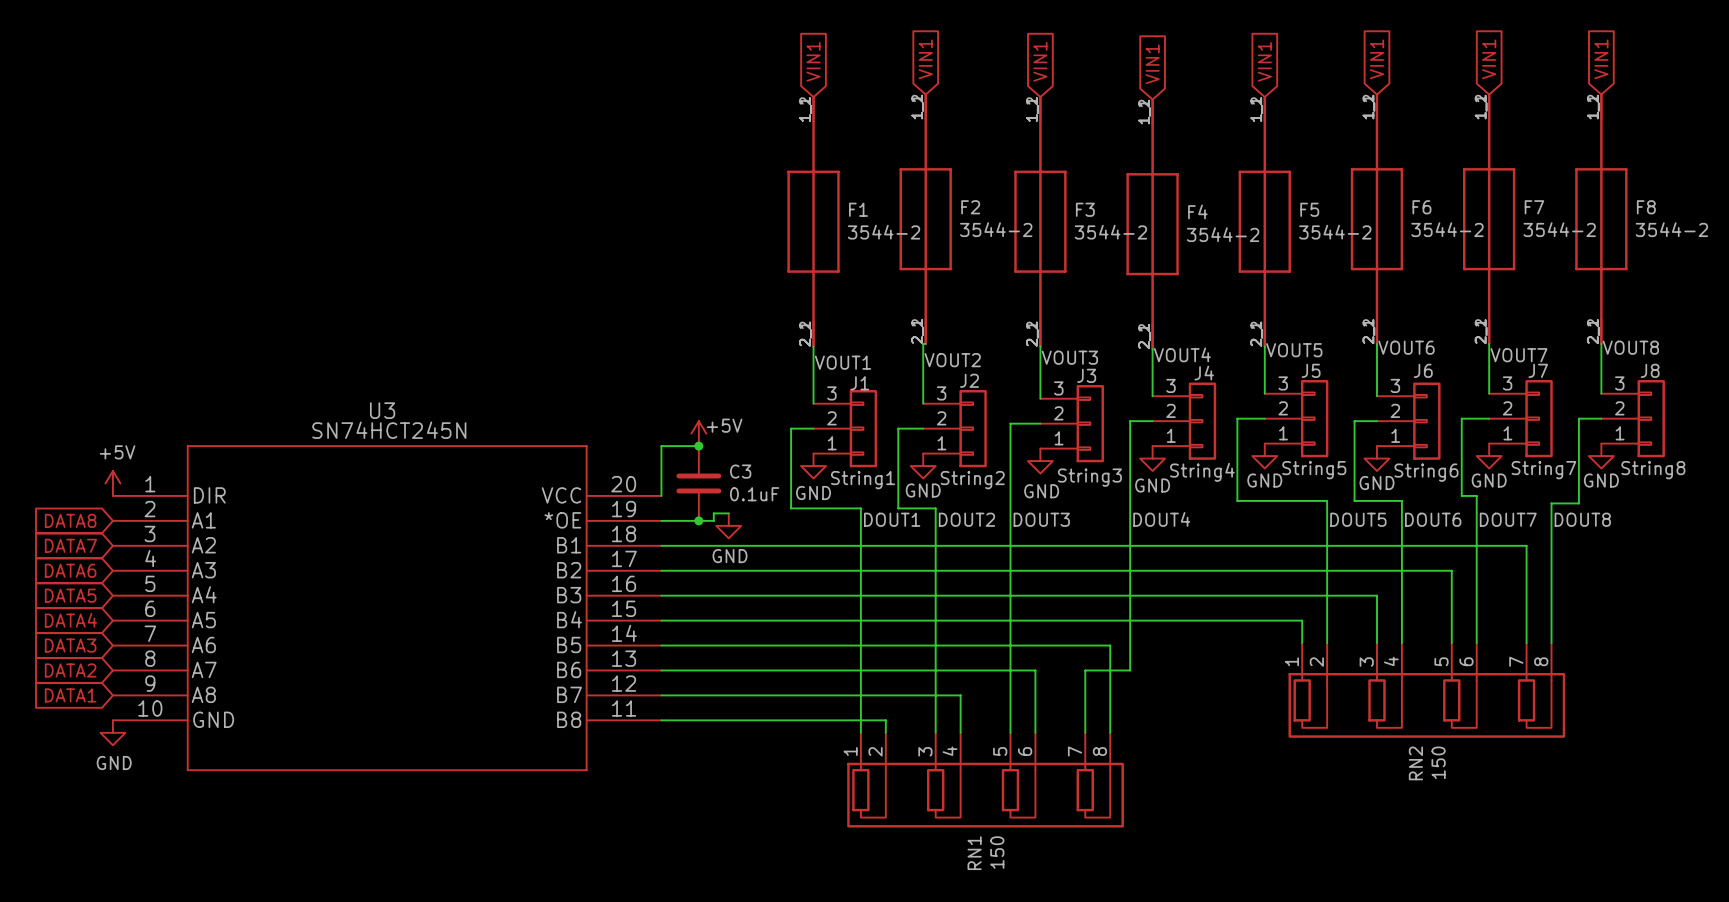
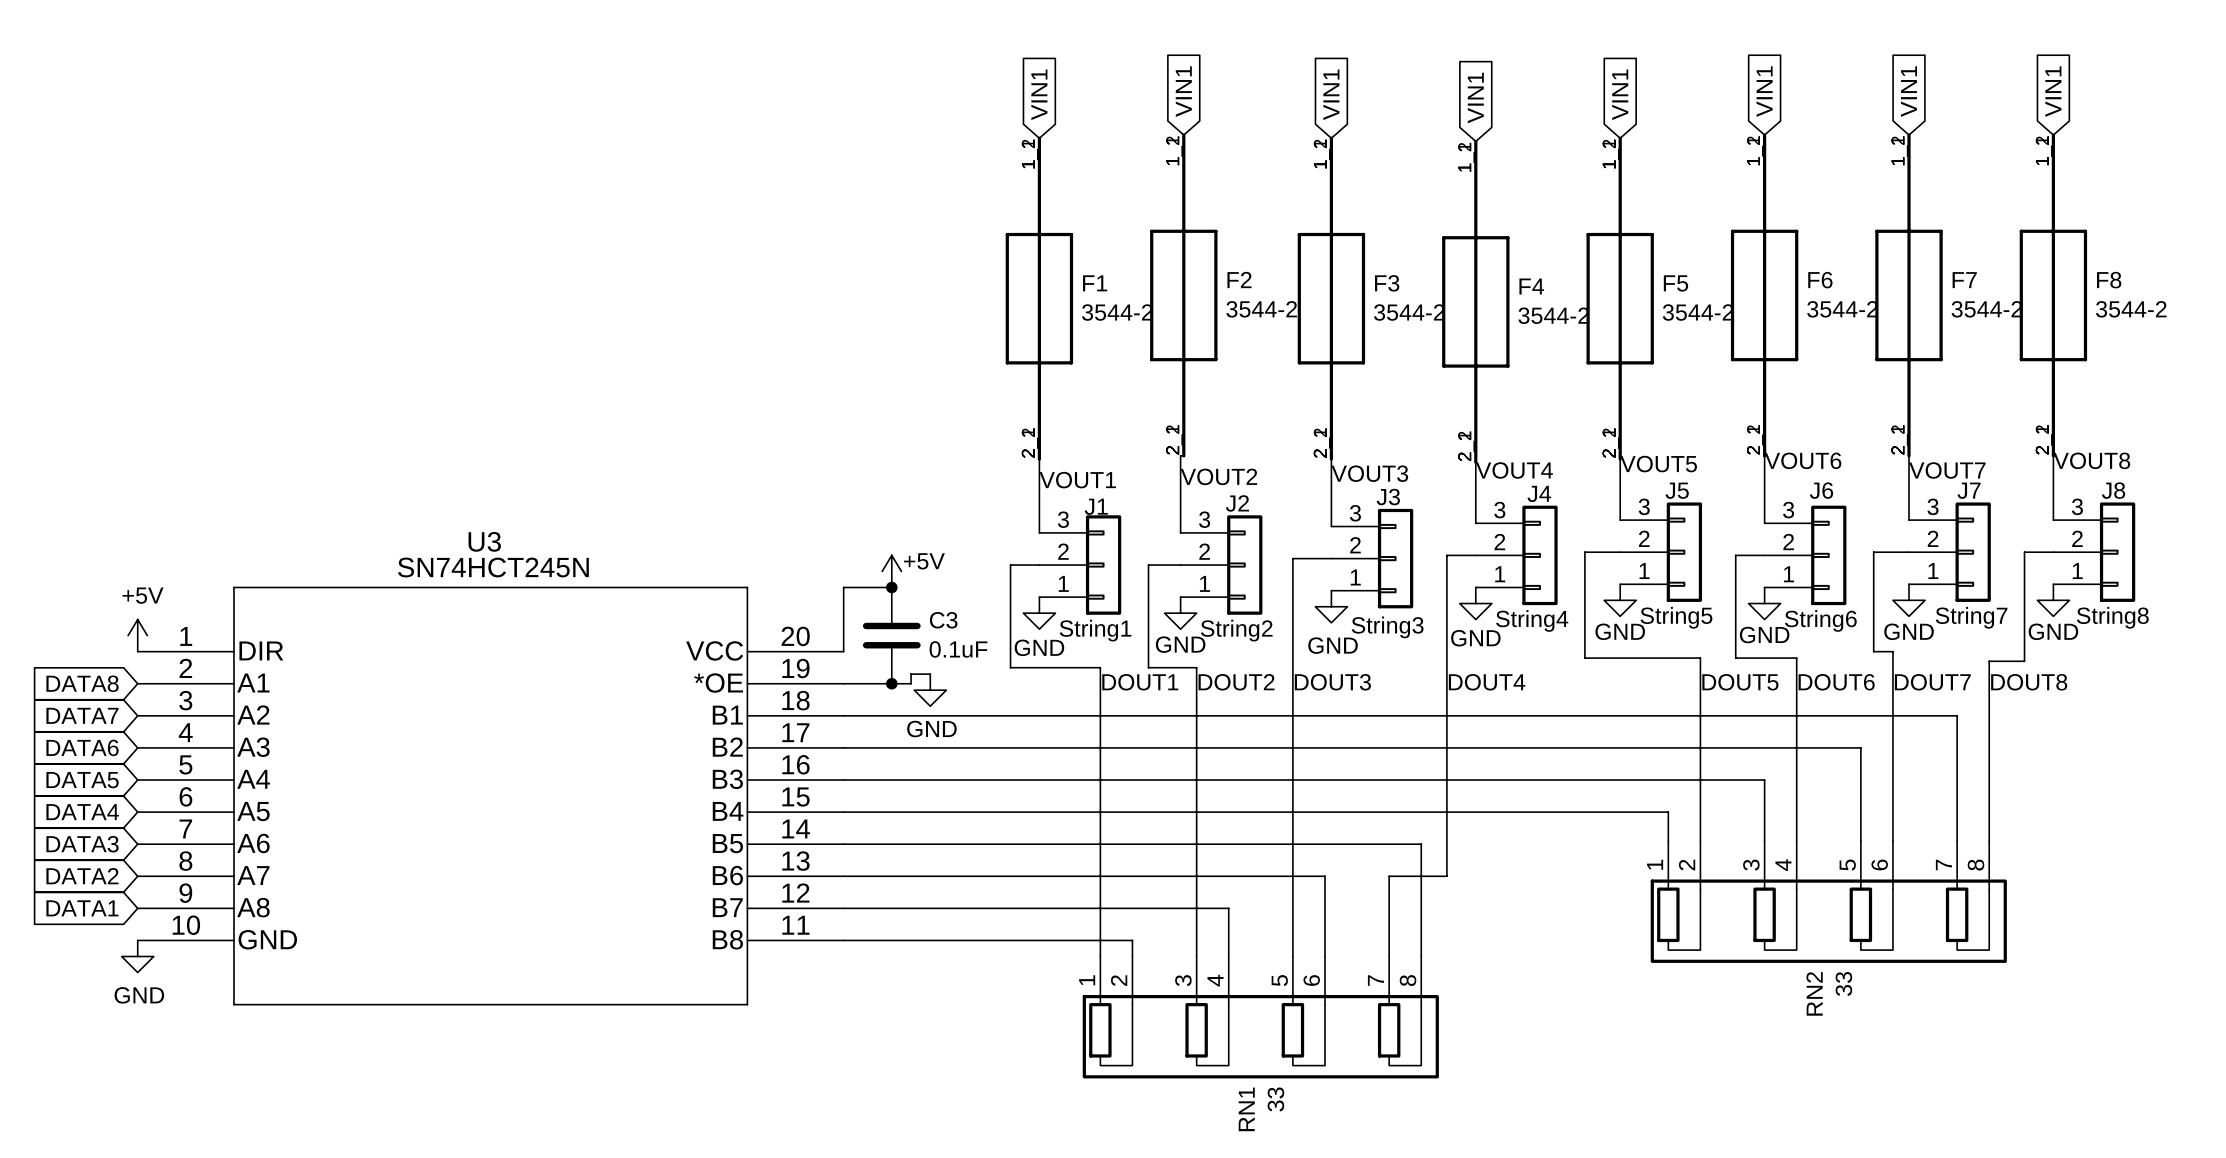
RN2 value: 150 (1438, 762) -> 33 (1843, 983)
RN1 value: 150 (997, 852) -> 33 (1275, 1099)

